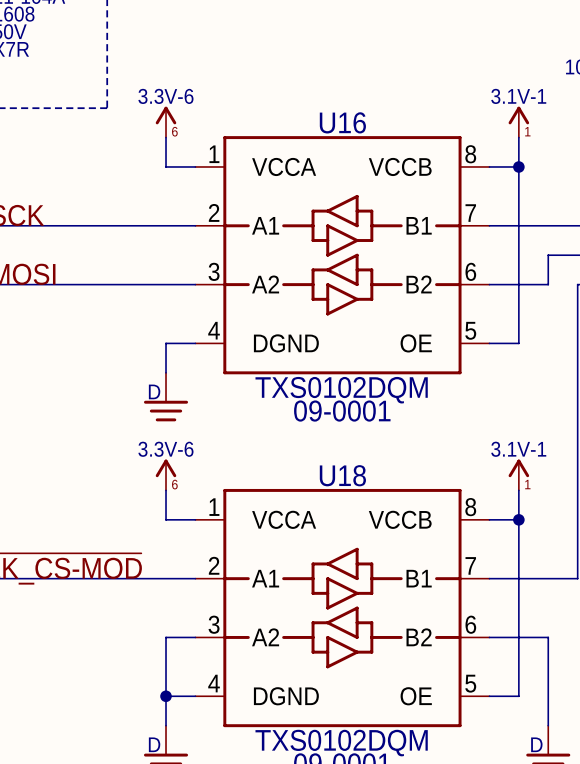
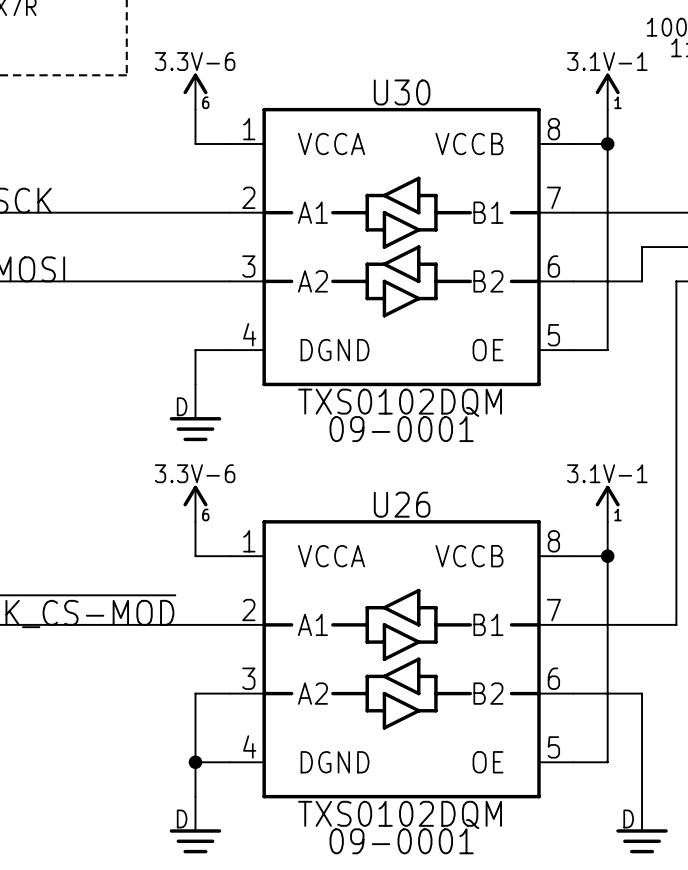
U16 name: U16 (342, 122) -> U30 (402, 92)
U18 name: U18 (342, 475) -> U26 (402, 504)

